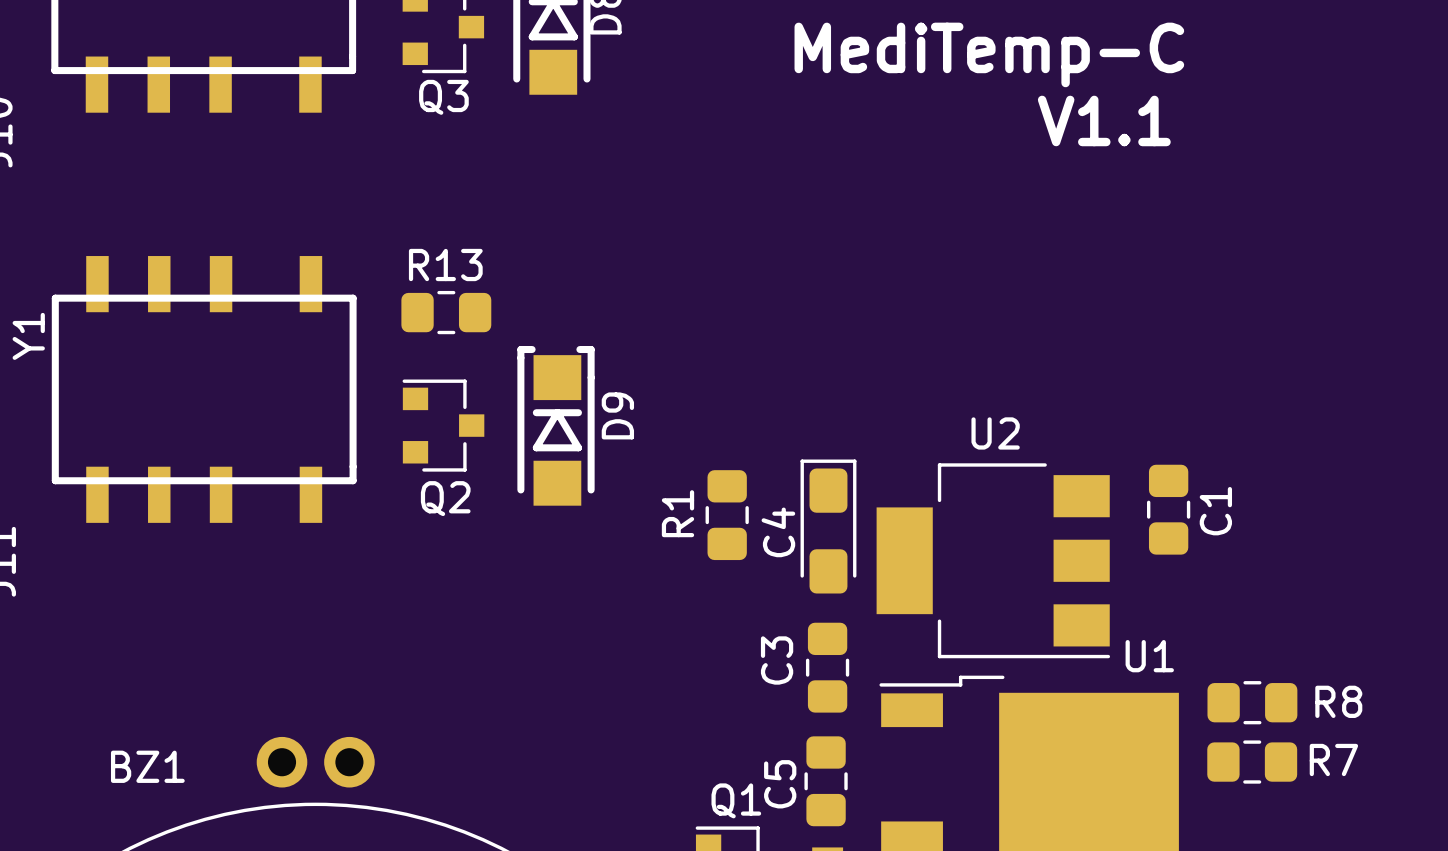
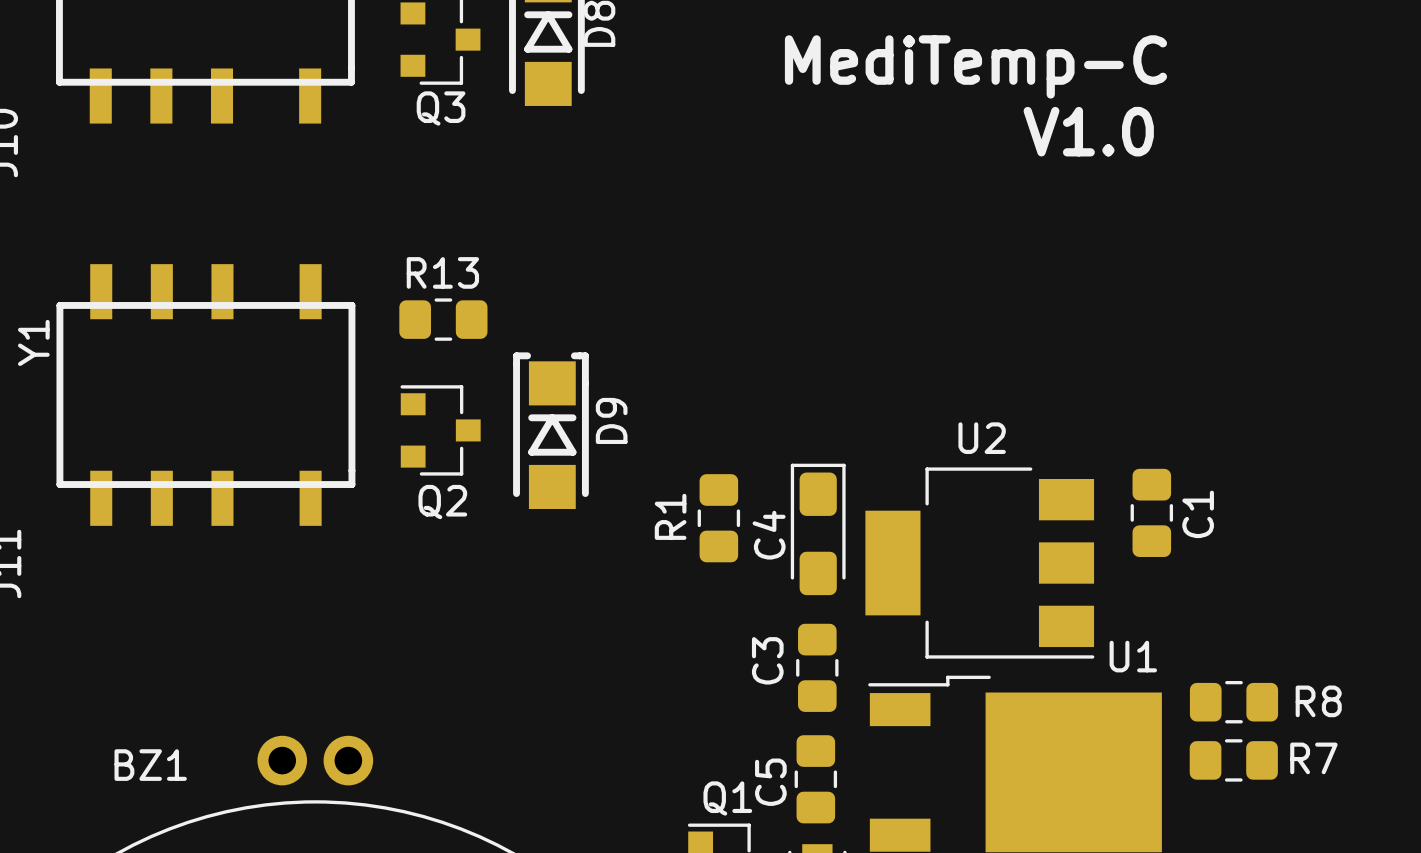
text: V1.1 (1104, 120) -> V1.0 (1088, 131)

